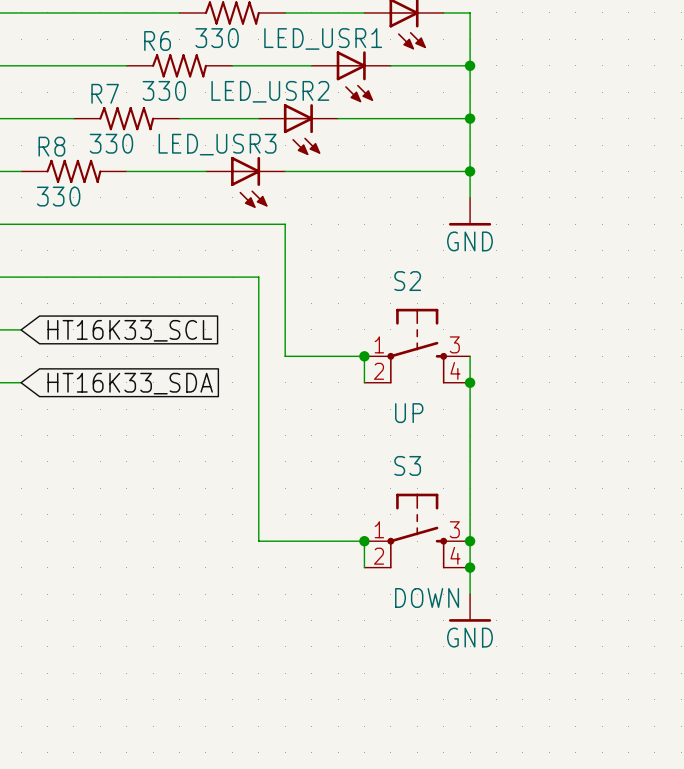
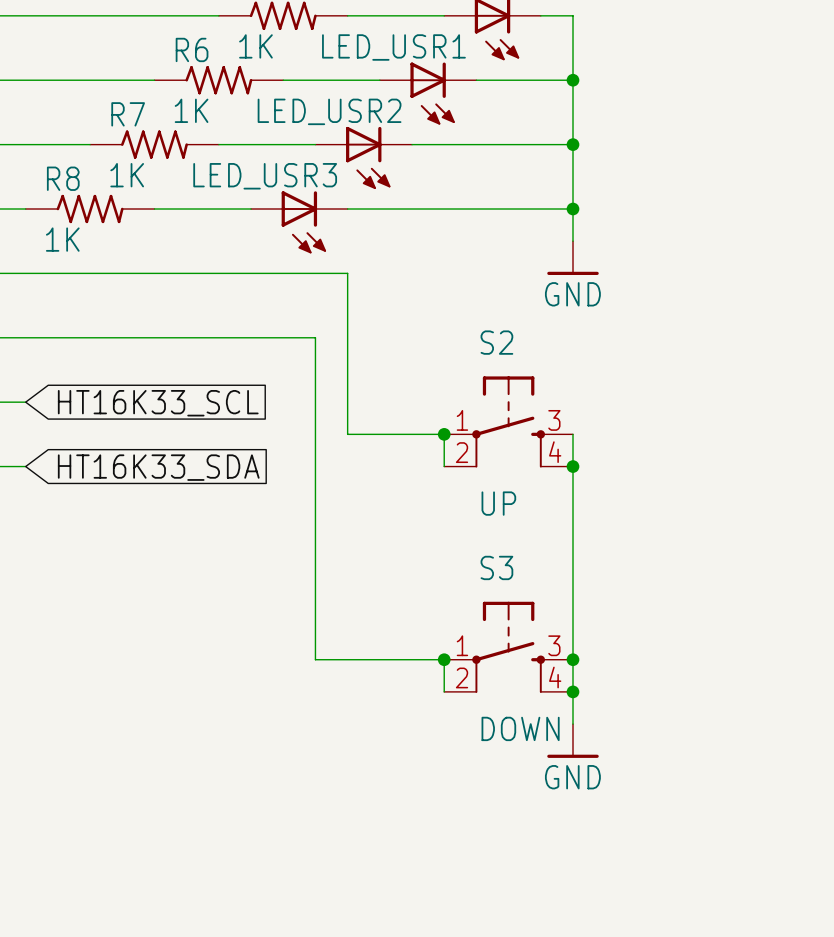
part value: 330 (217, 38) -> 1K (255, 46)
R6 value: 330 (164, 90) -> 1K (191, 110)
R7 value: 330 (111, 143) -> 1K (127, 175)
R8 value: 330 (58, 196) -> 1K (62, 239)

